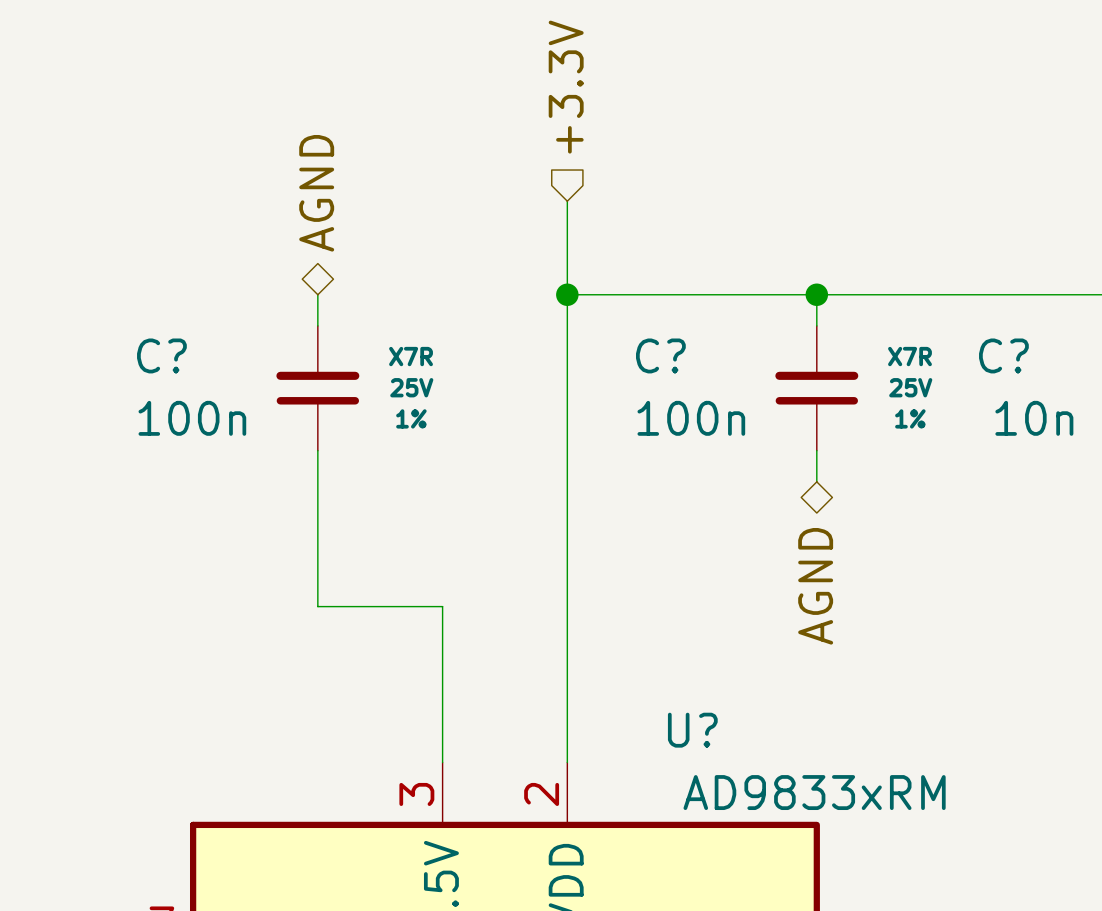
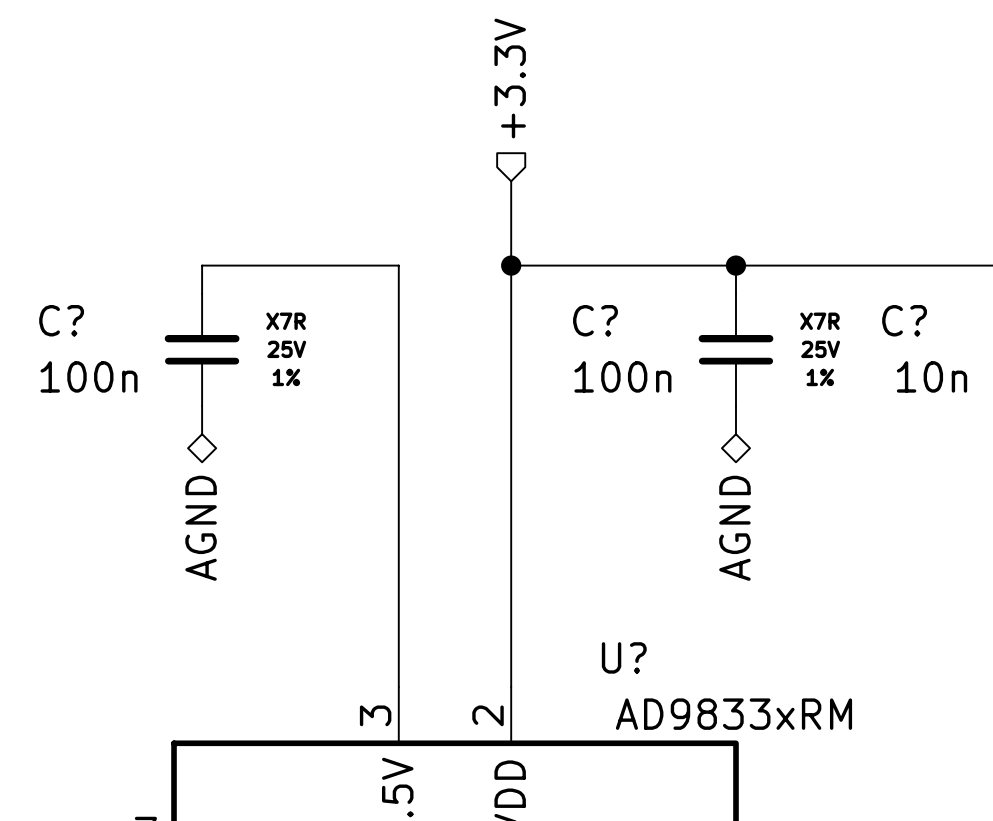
hierarchical label rotation: 0° (316, 193) -> 180° (201, 528)
hierarchical label position: AGND (316, 193) -> AGND (201, 528)
wire: (317, 294) (317, 325) -> (202, 406) (202, 434)
C? position: (317, 388) -> (202, 349)
wire: (317, 450) (317, 606) (442, 606) -> (202, 293) (202, 265) (398, 265) (398, 546)

